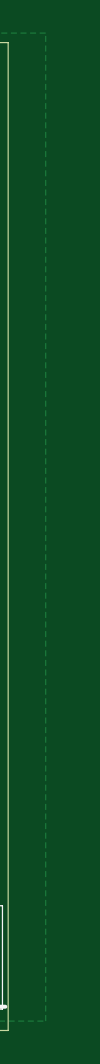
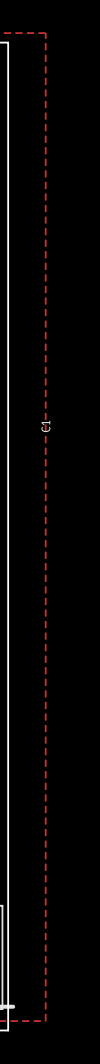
C1: none -> (45, 426)
line: none -> (5, 1006) (13, 1006)

